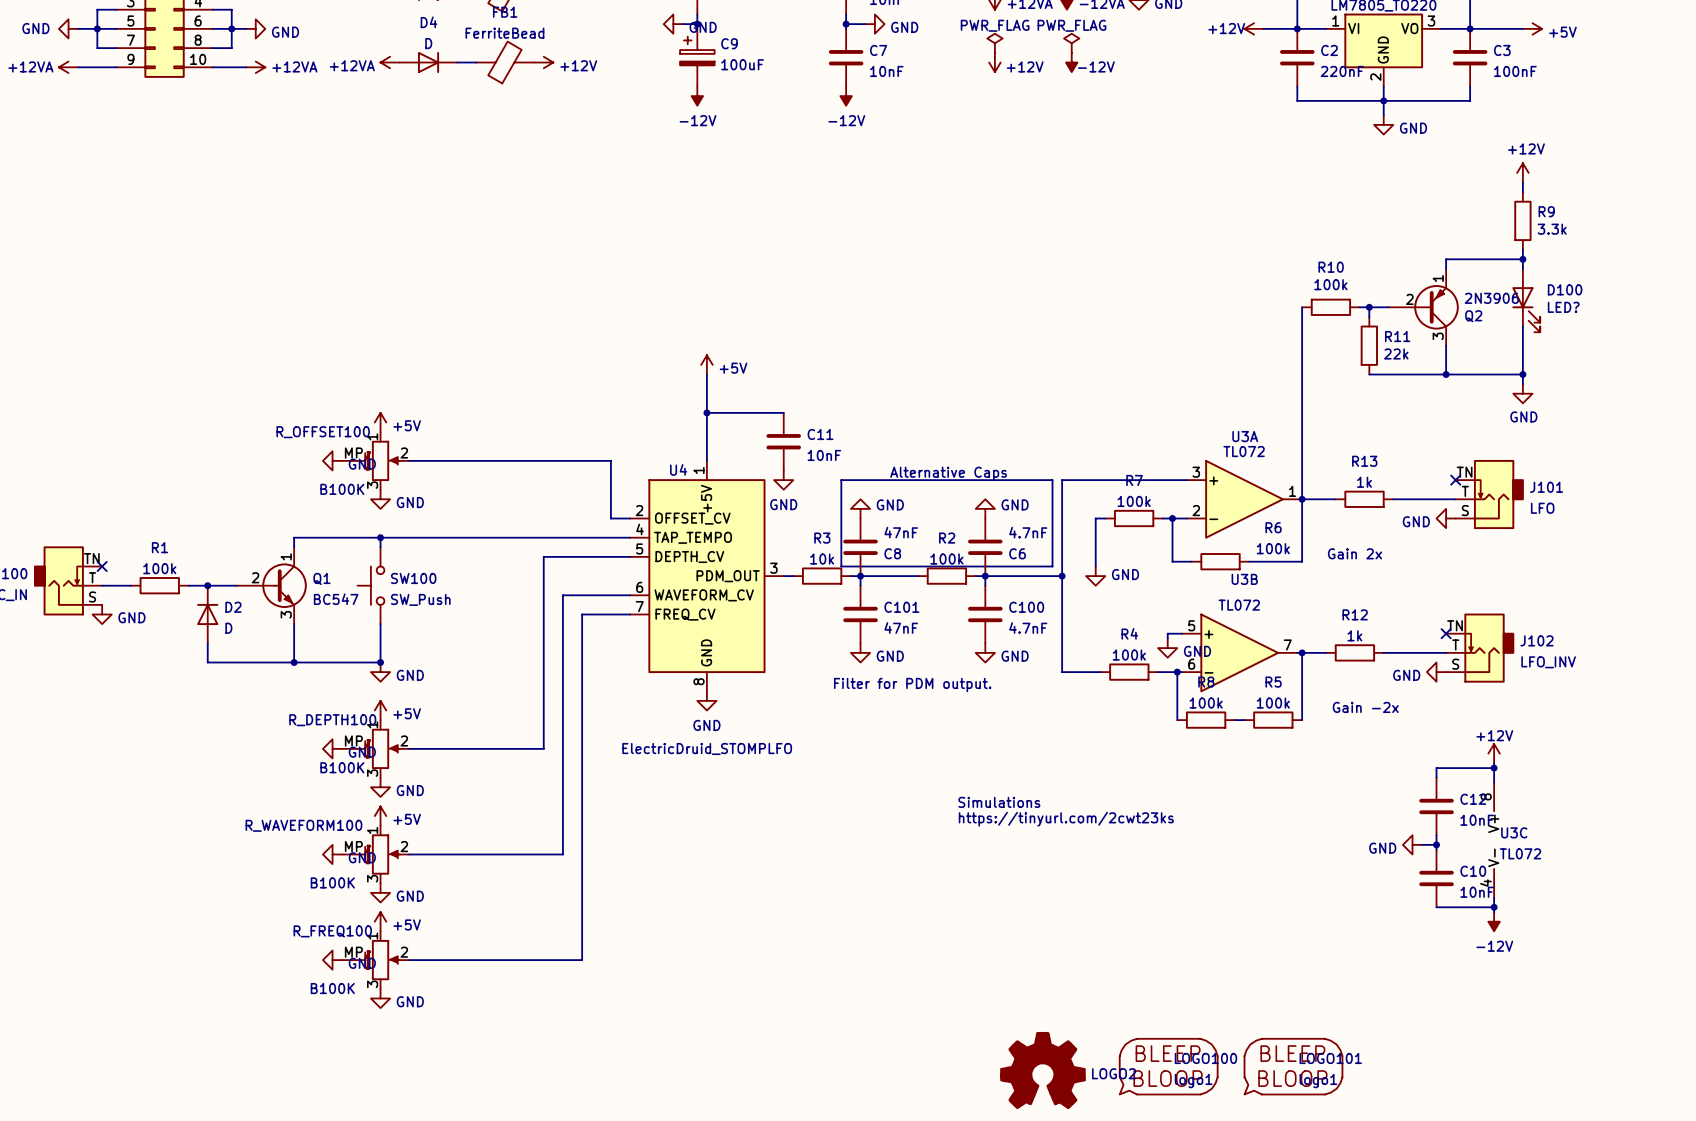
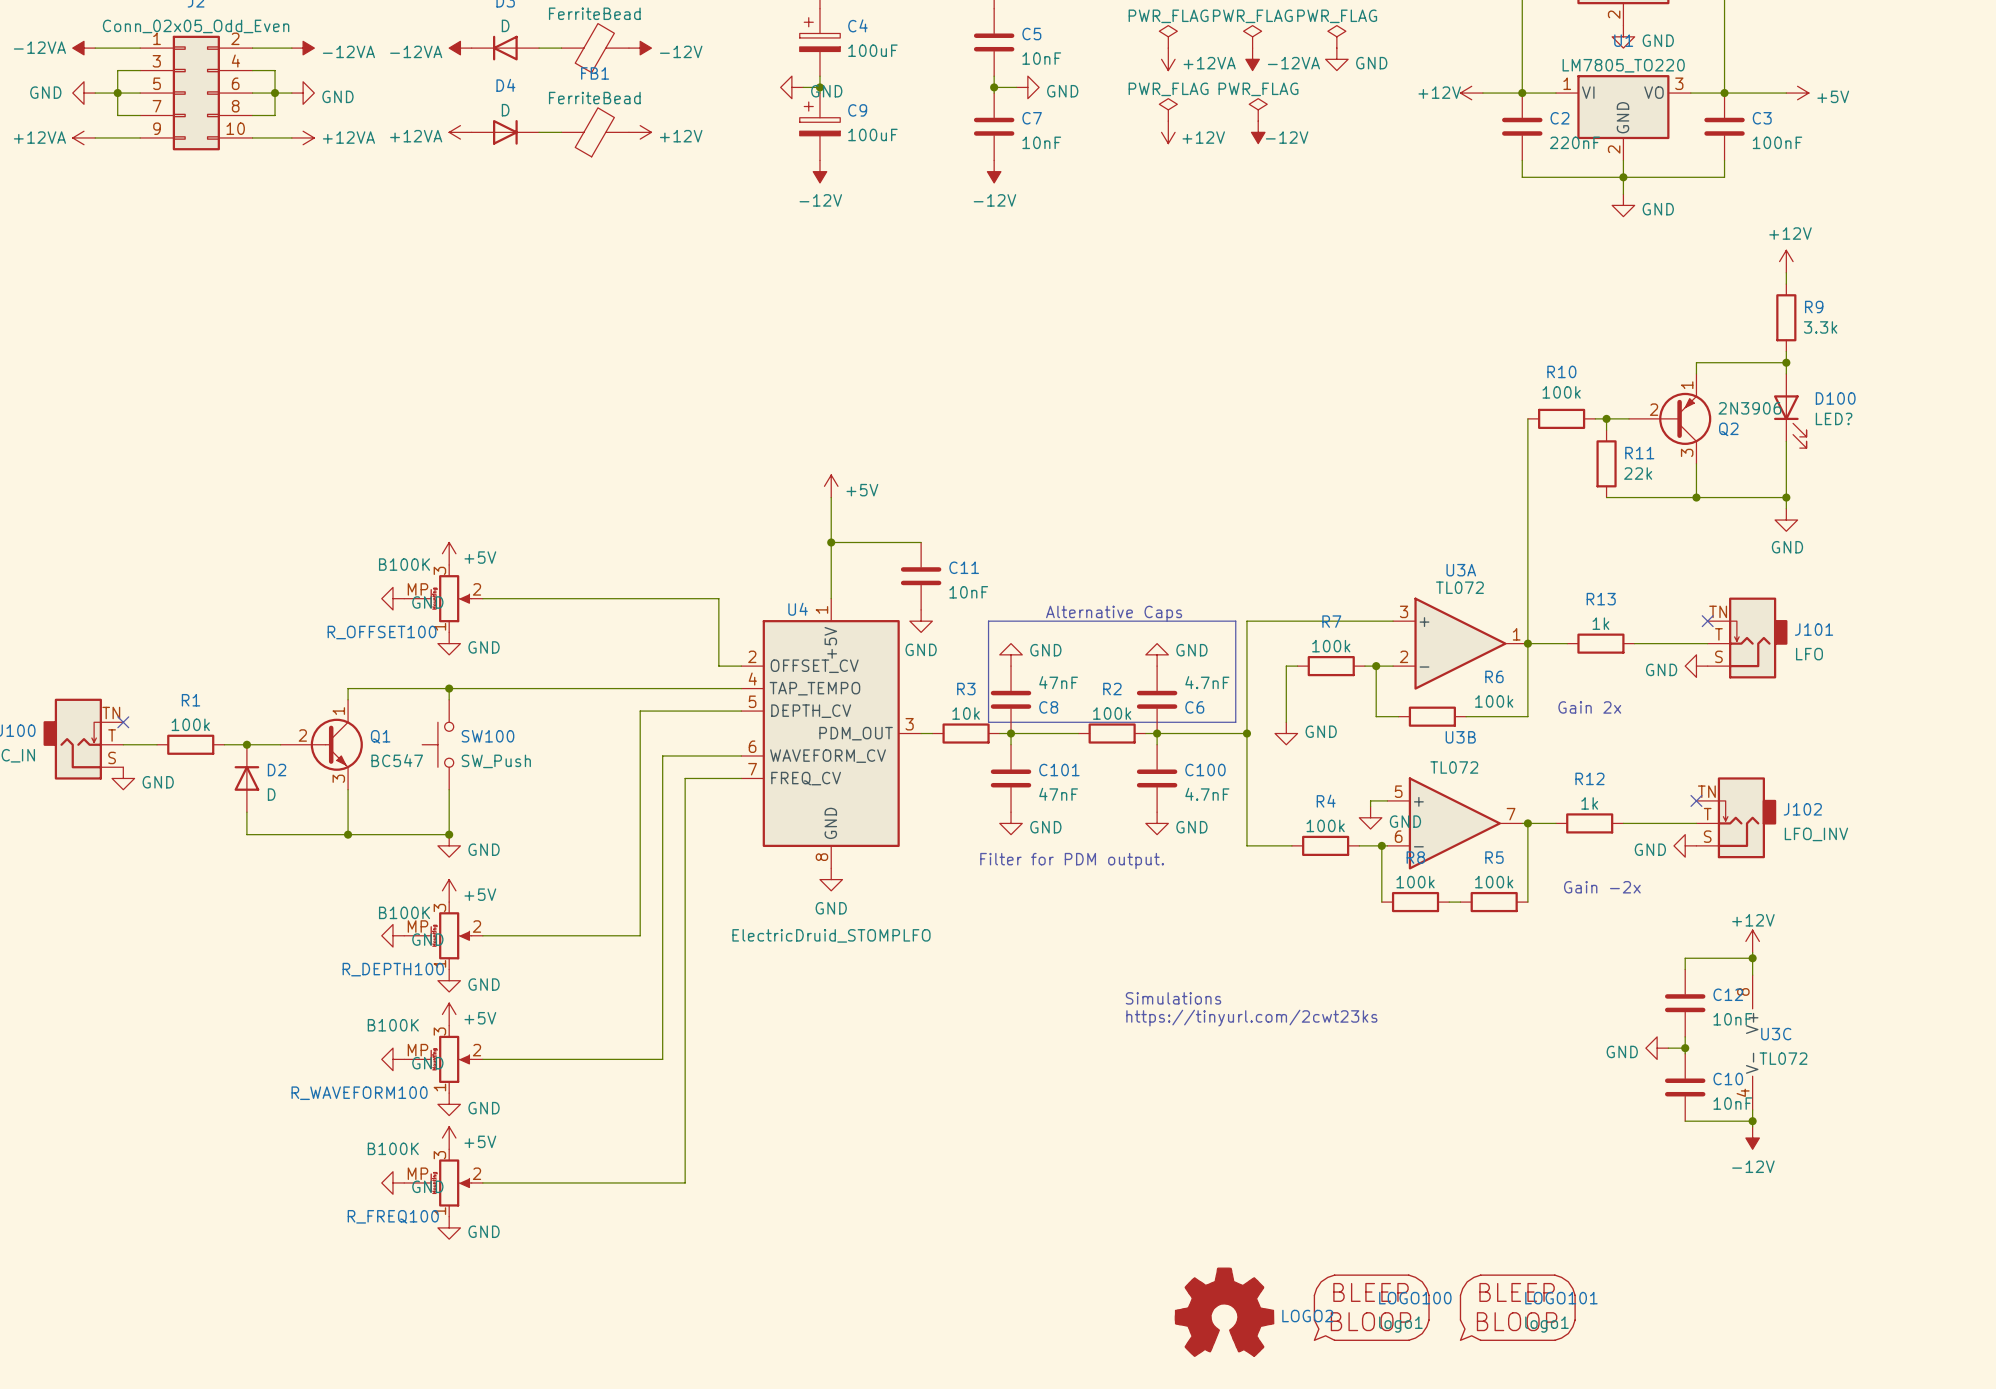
R_OFFSET100 flip: as is (382, 460) -> up-down (451, 598)
R_DEPTH100 flip: as is (382, 748) -> up-down (451, 935)
R_WAVEFORM100 flip: as is (382, 854) -> up-down (451, 1059)
R_FREQ100 flip: as is (382, 960) -> up-down (451, 1182)

